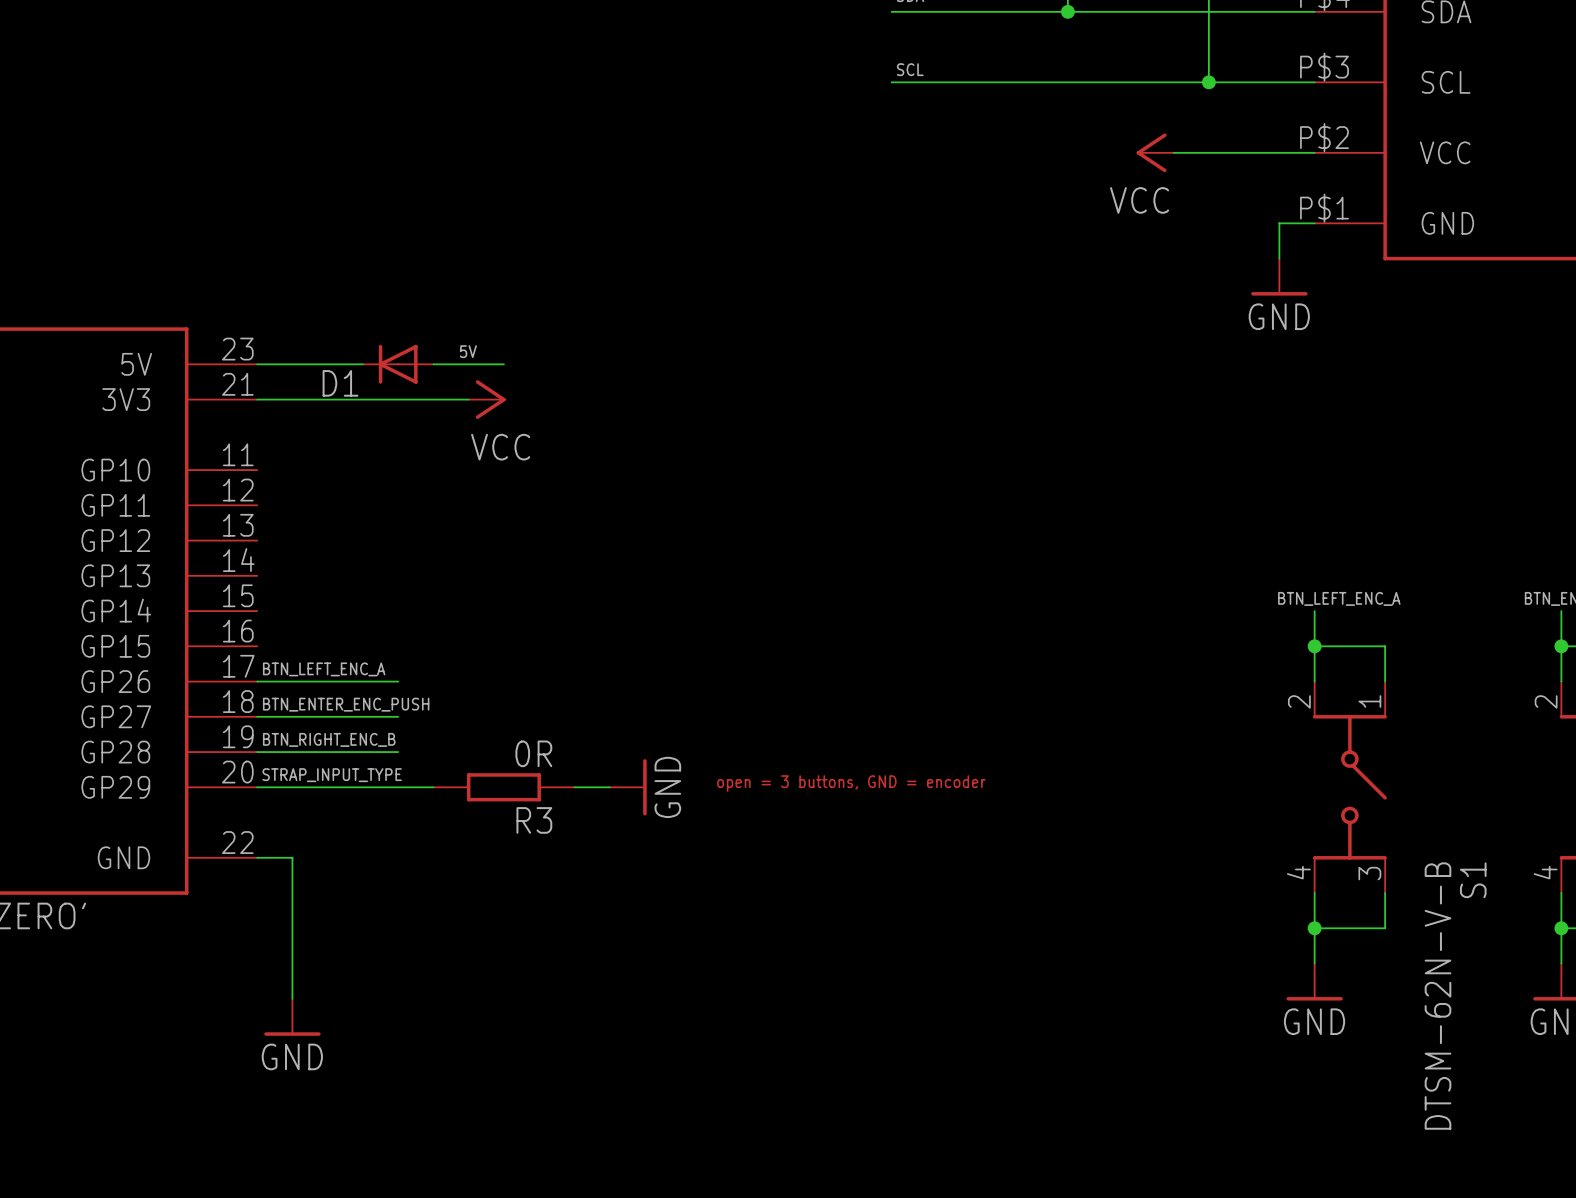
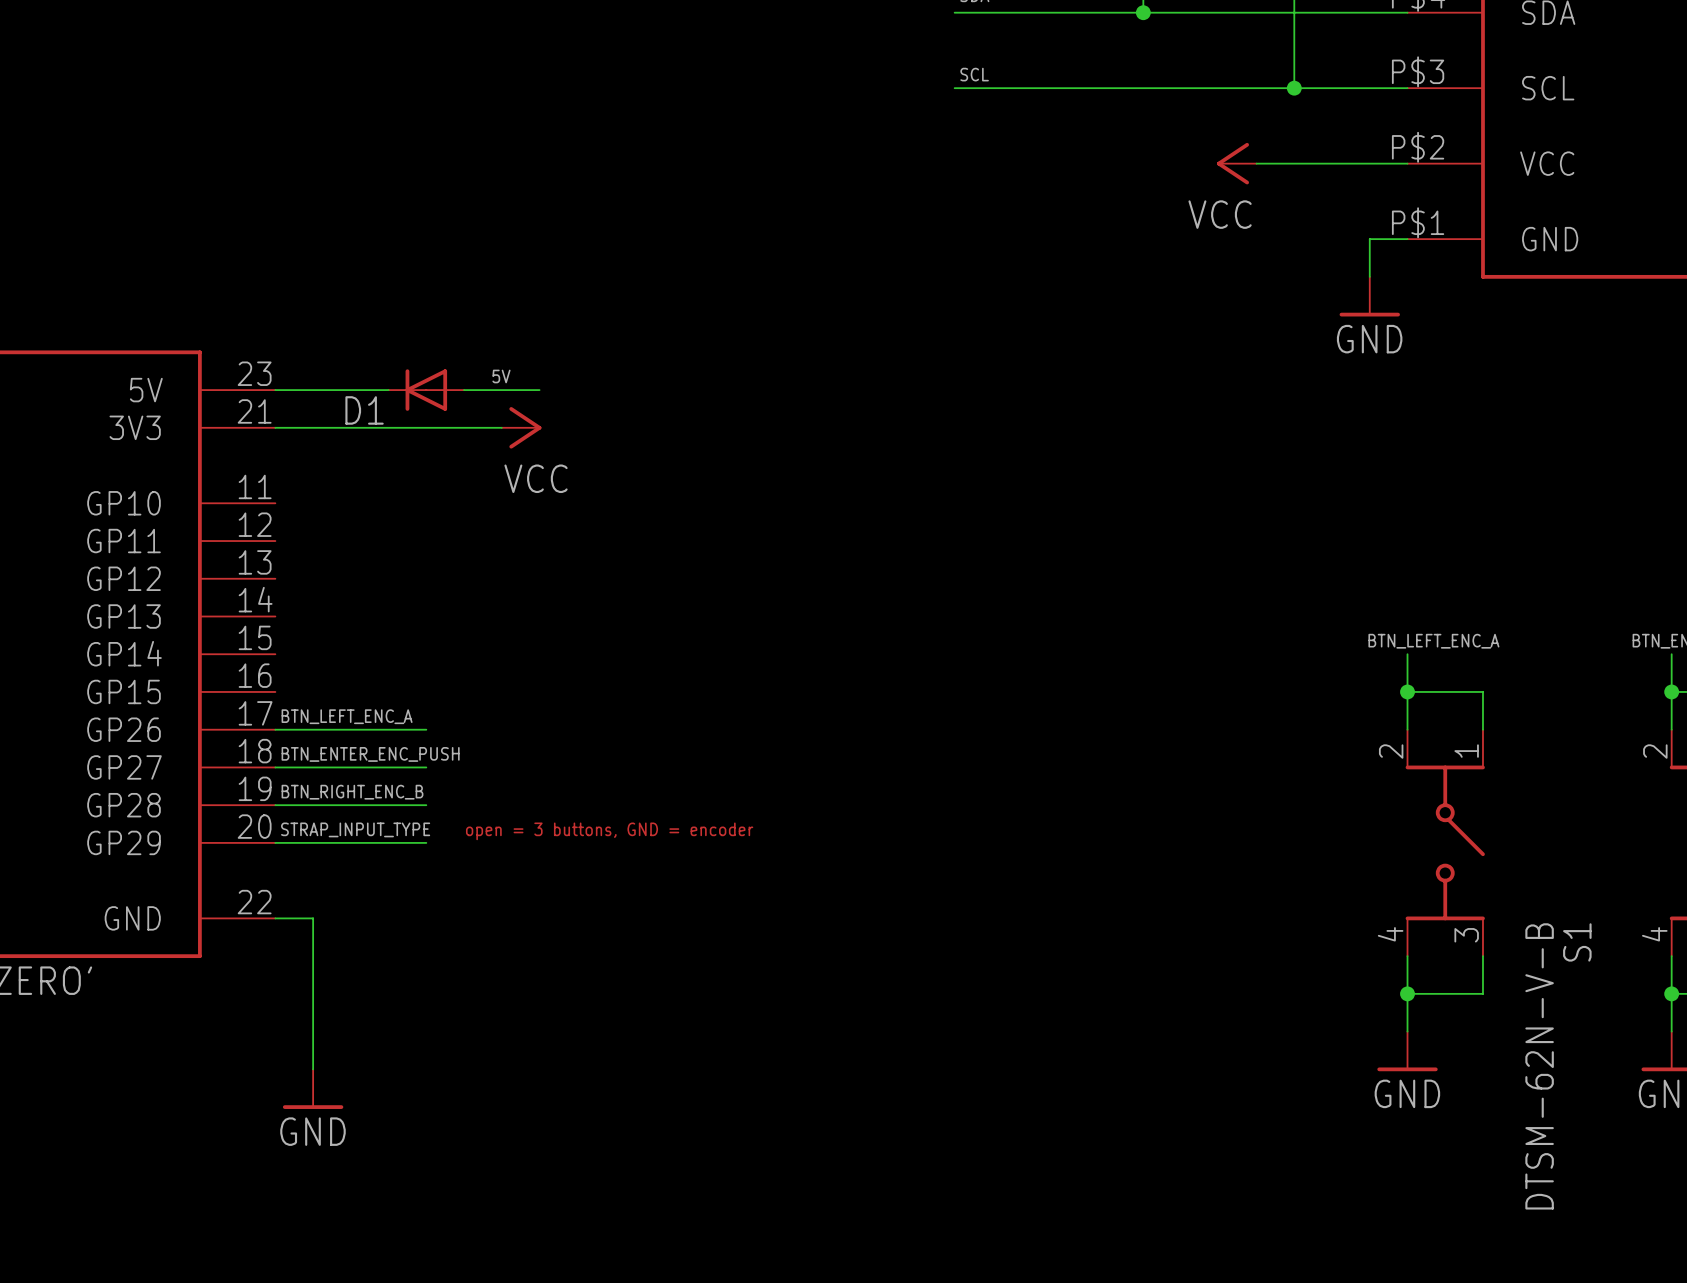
text position: open = 3 buttons, GND = encoder (851, 783) -> open = 3 buttons, GND = encoder (609, 831)
wire: (398, 787) (433, 787) -> none
R3: 0R (503, 787) -> none
wire: (574, 787) (609, 787) -> none
power symbol: GND (628, 787) -> none

